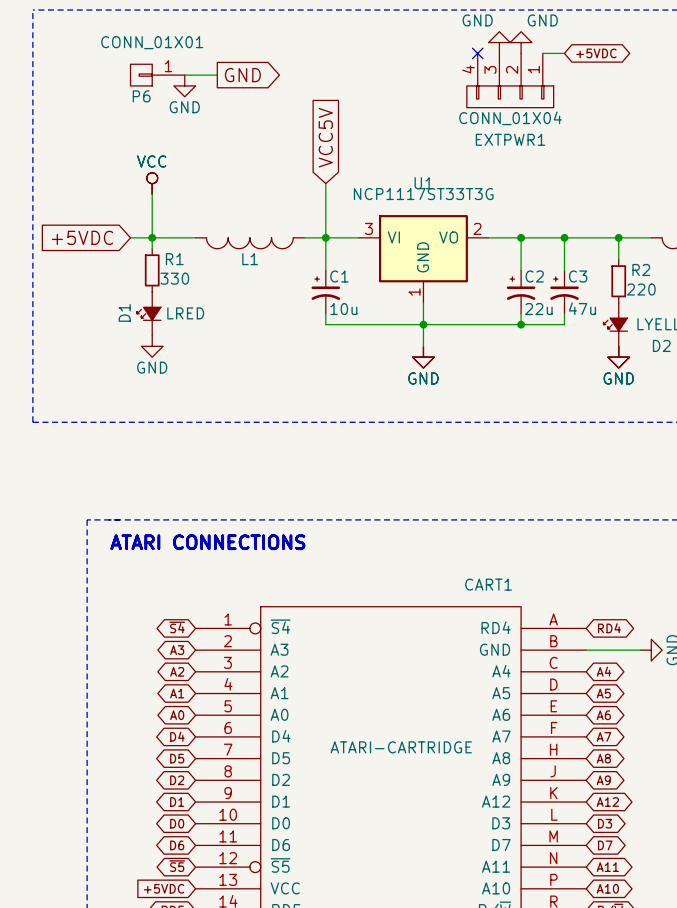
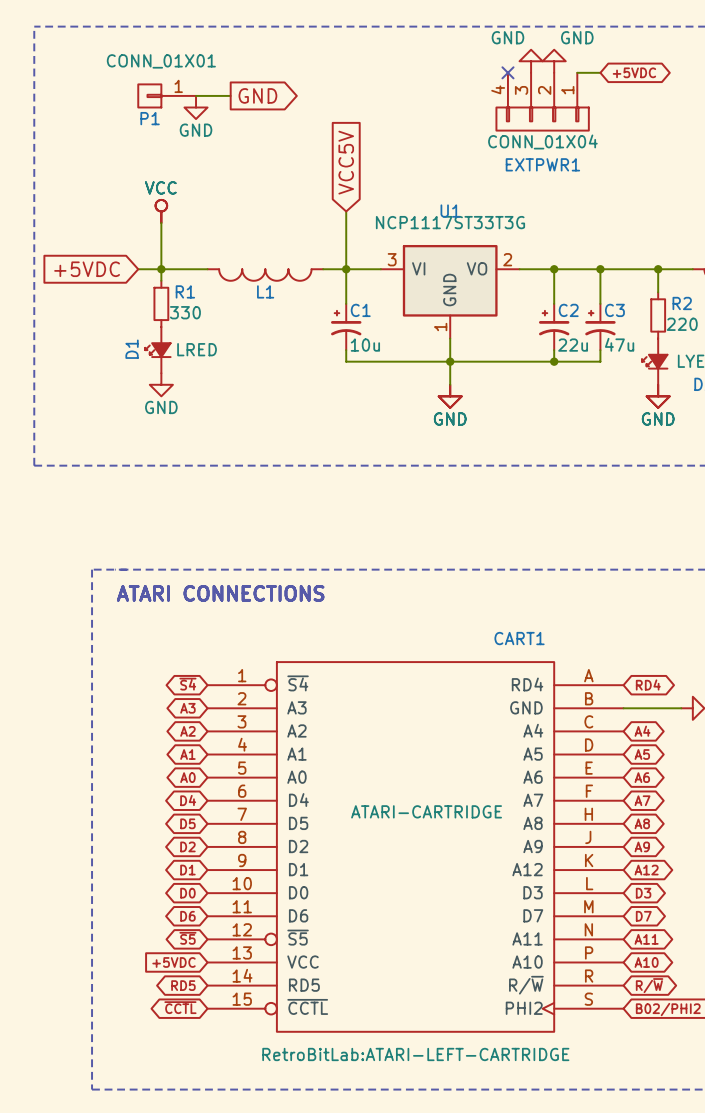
P6 name: P6 (141, 96) -> P1 (150, 118)

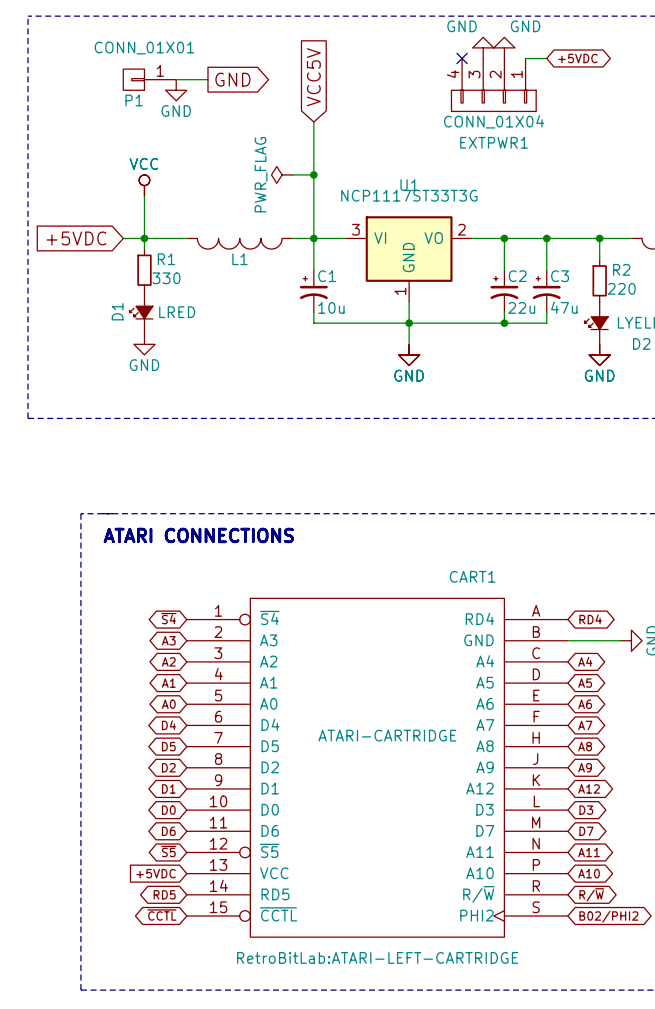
wire: none -> (313, 122) (313, 185)
global label position: VCC5V (346, 162) -> VCC5V (313, 77)
power symbol: none -> PWR_FLAG (282, 174)
wire: none -> (292, 174) (313, 174)
junction: none -> (313, 174)

